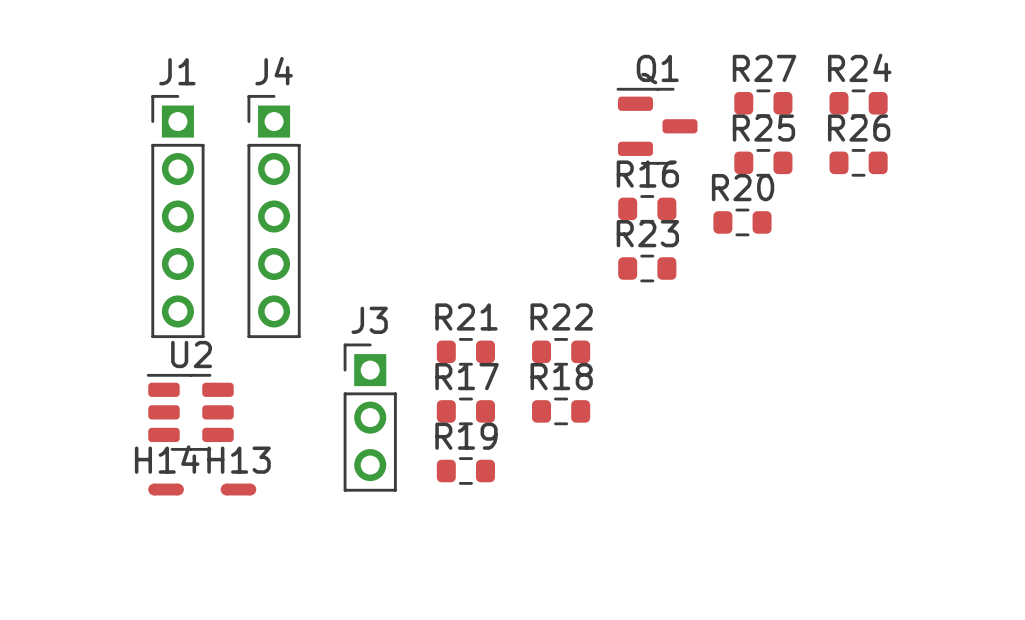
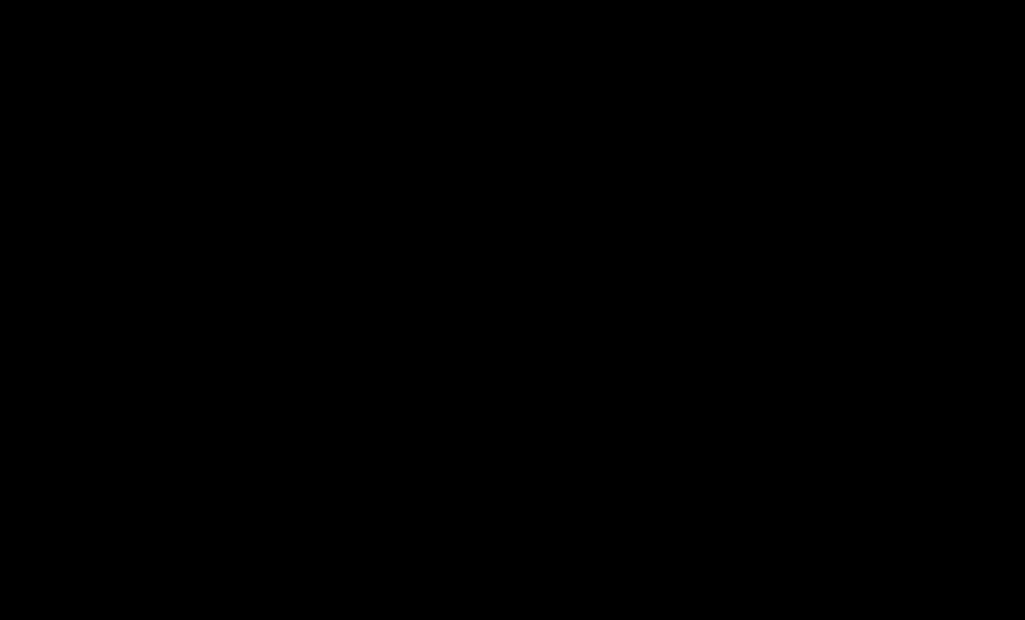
R27: (763, 103) -> none
R24: (858, 103) -> none
Q1: (657, 126) -> none
R25: (763, 162) -> none
R26: (858, 162) -> none
R16: (647, 208) -> none
J1: (177, 216) -> none
J4: (274, 216) -> none
R20: (742, 222) -> none
R23: (647, 268) -> none
R21: (465, 351) -> none
R22: (561, 351) -> none
R17: (465, 411) -> none
R18: (561, 411) -> none
U2: (190, 412) -> none
J3: (370, 417) -> none
R19: (465, 471) -> none
H14: (166, 489) -> none
H13: (238, 489) -> none

